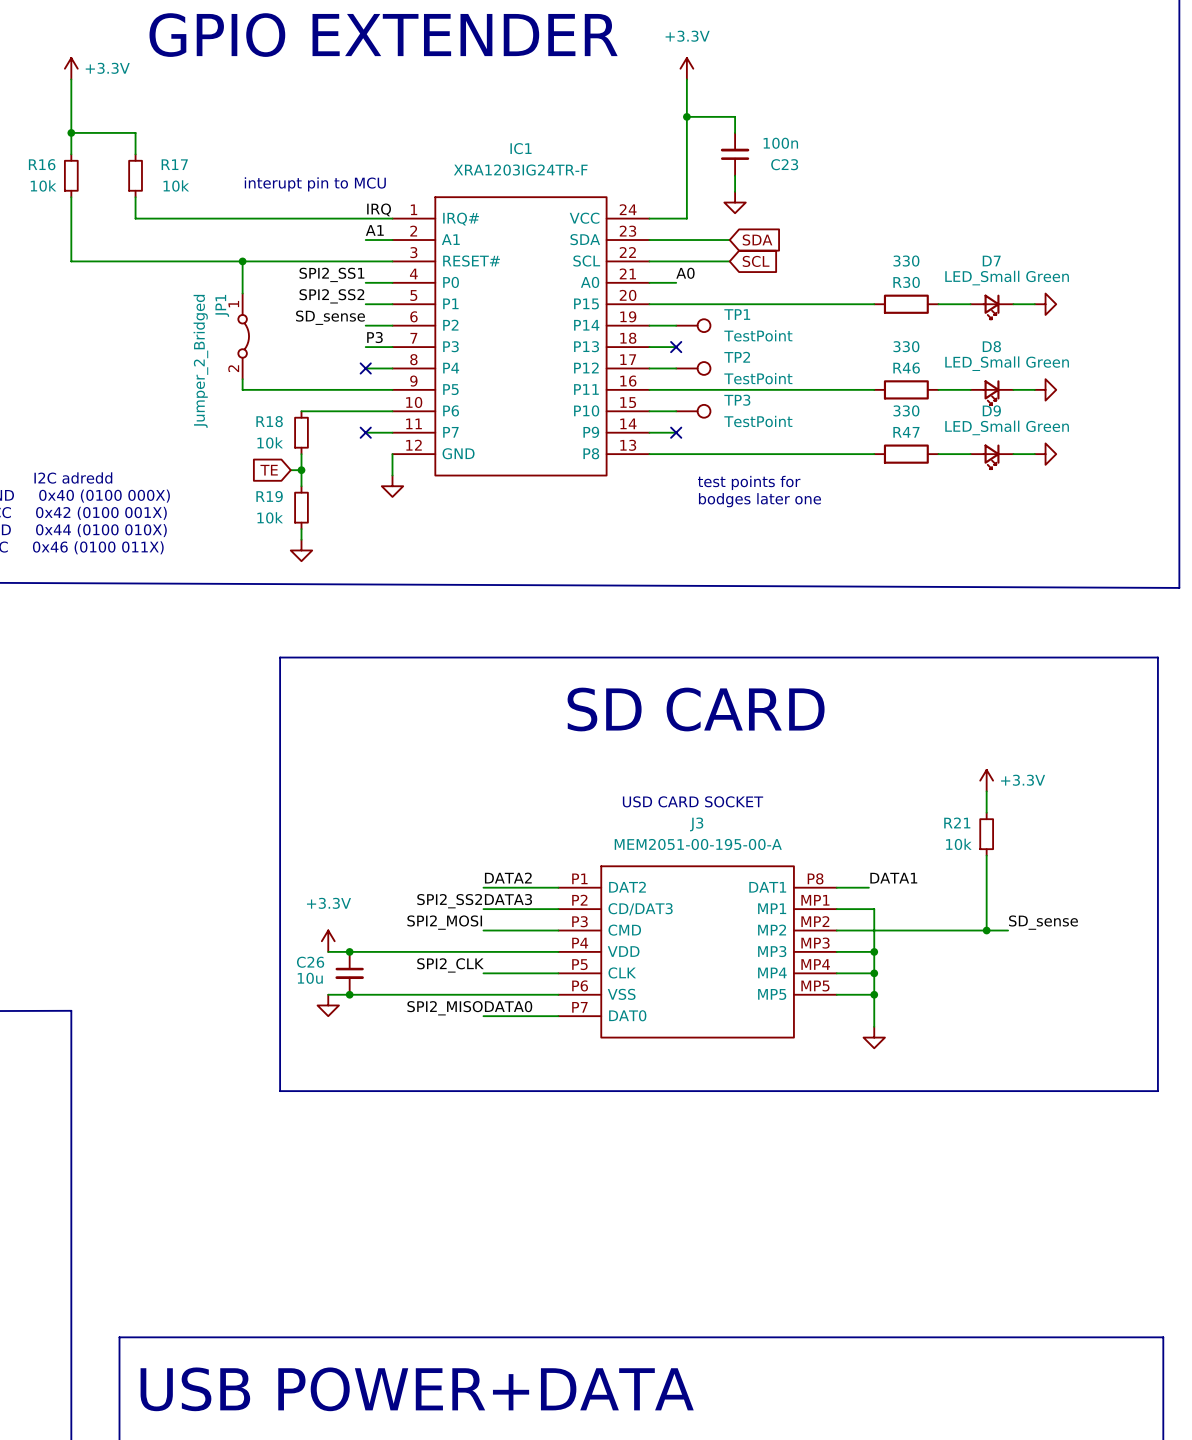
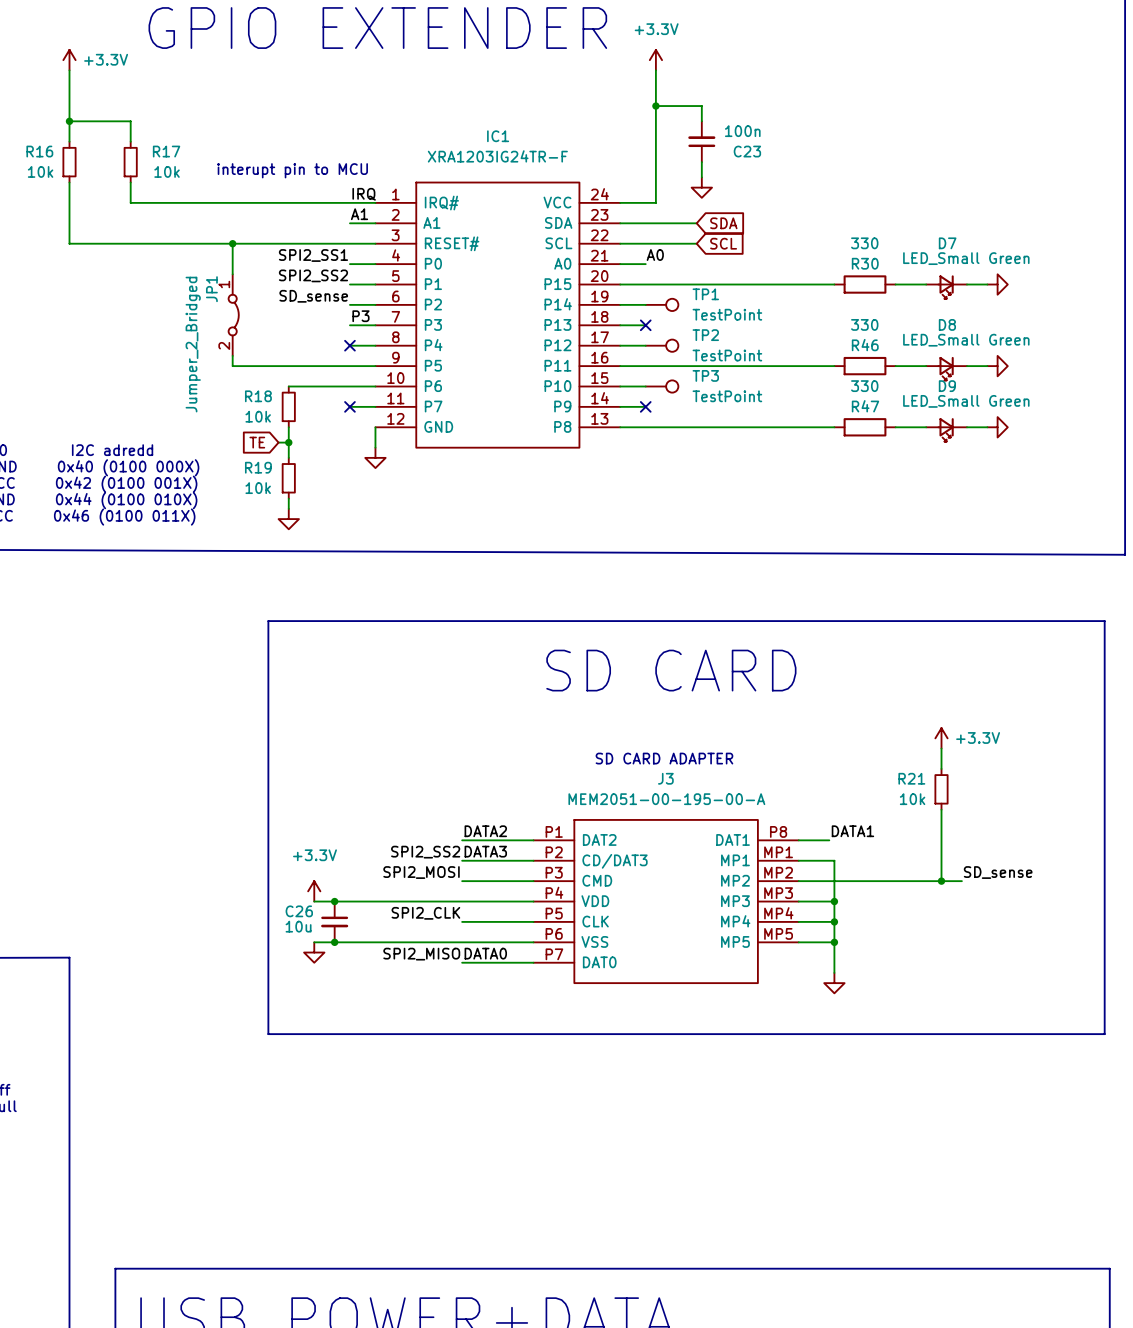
text: test points for (749, 482) -> none
text: bodges later one (759, 500) -> none
text: USD CARD SOCKET (693, 801) -> SD CARD ADAPTER (664, 758)

